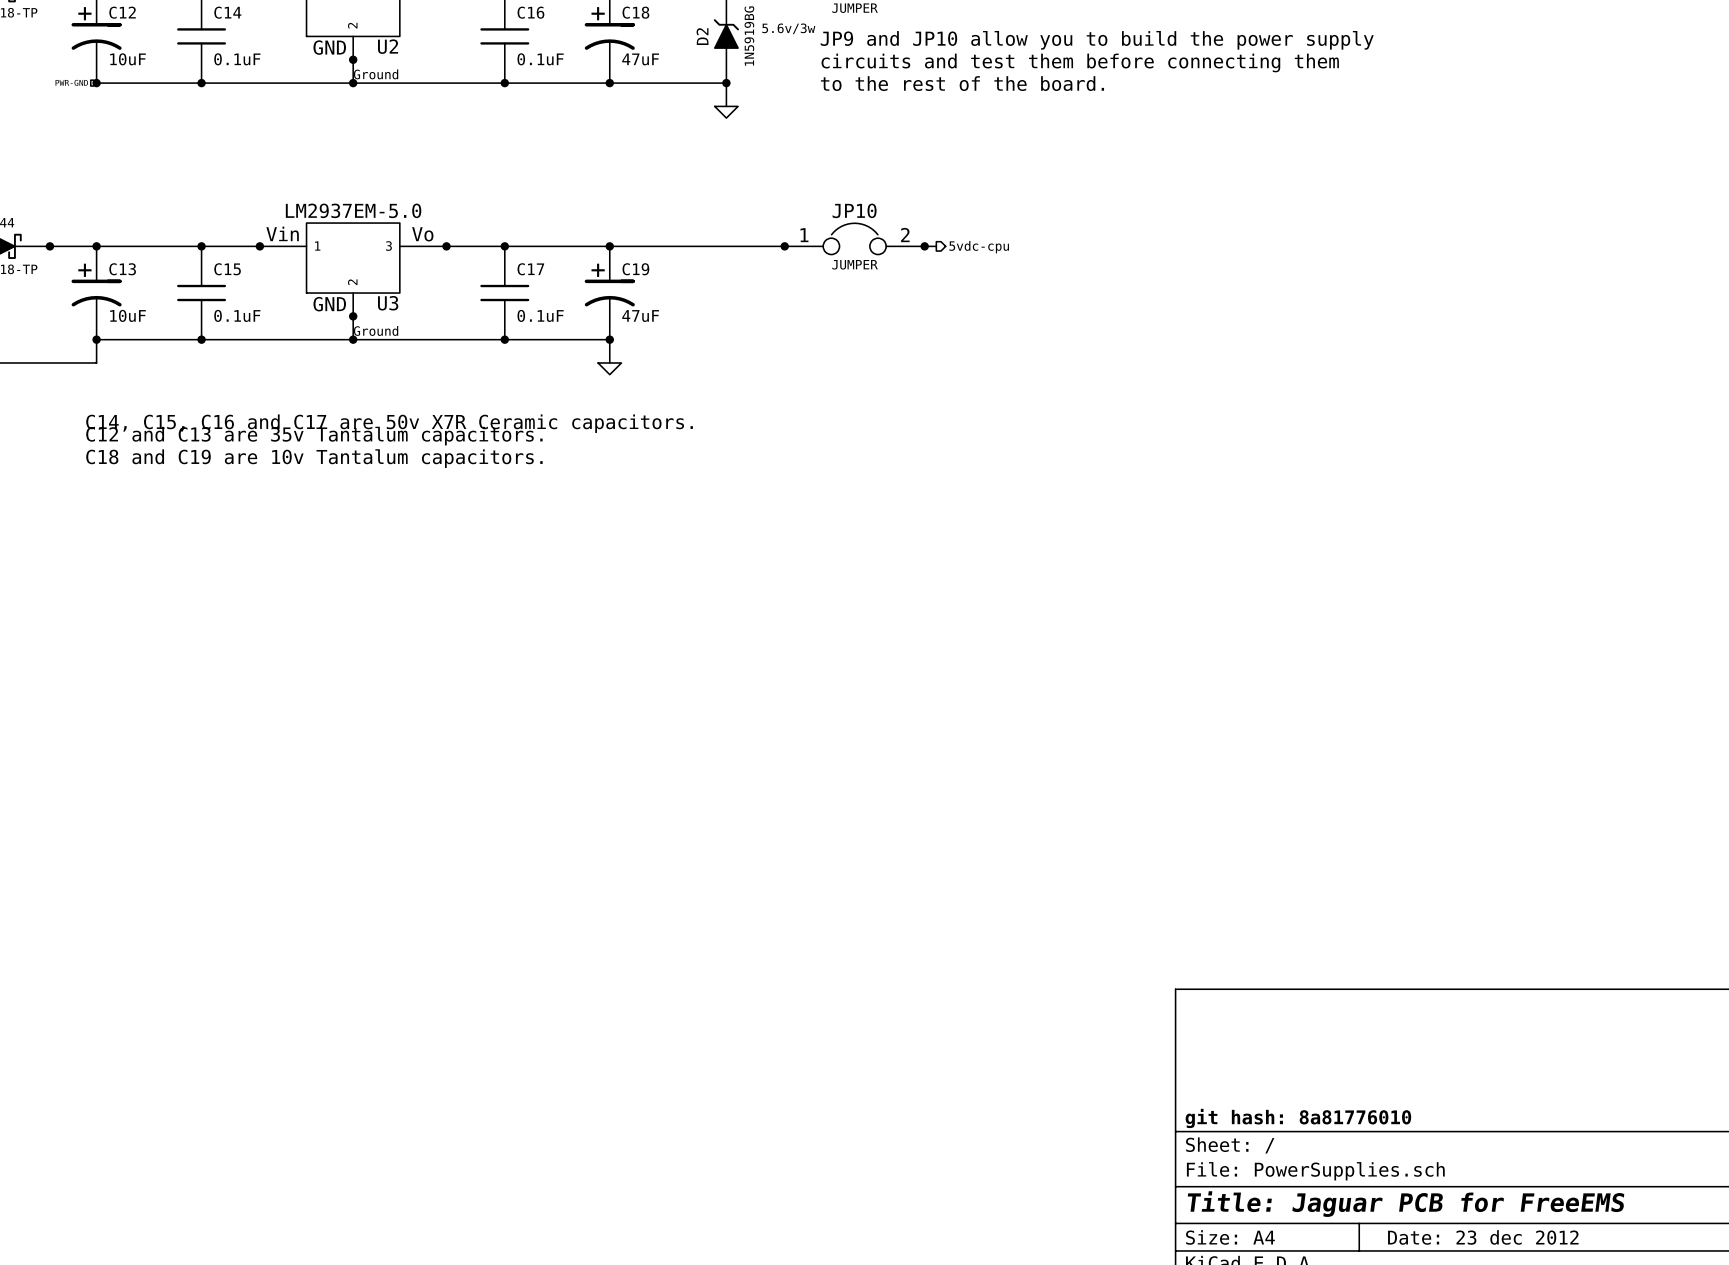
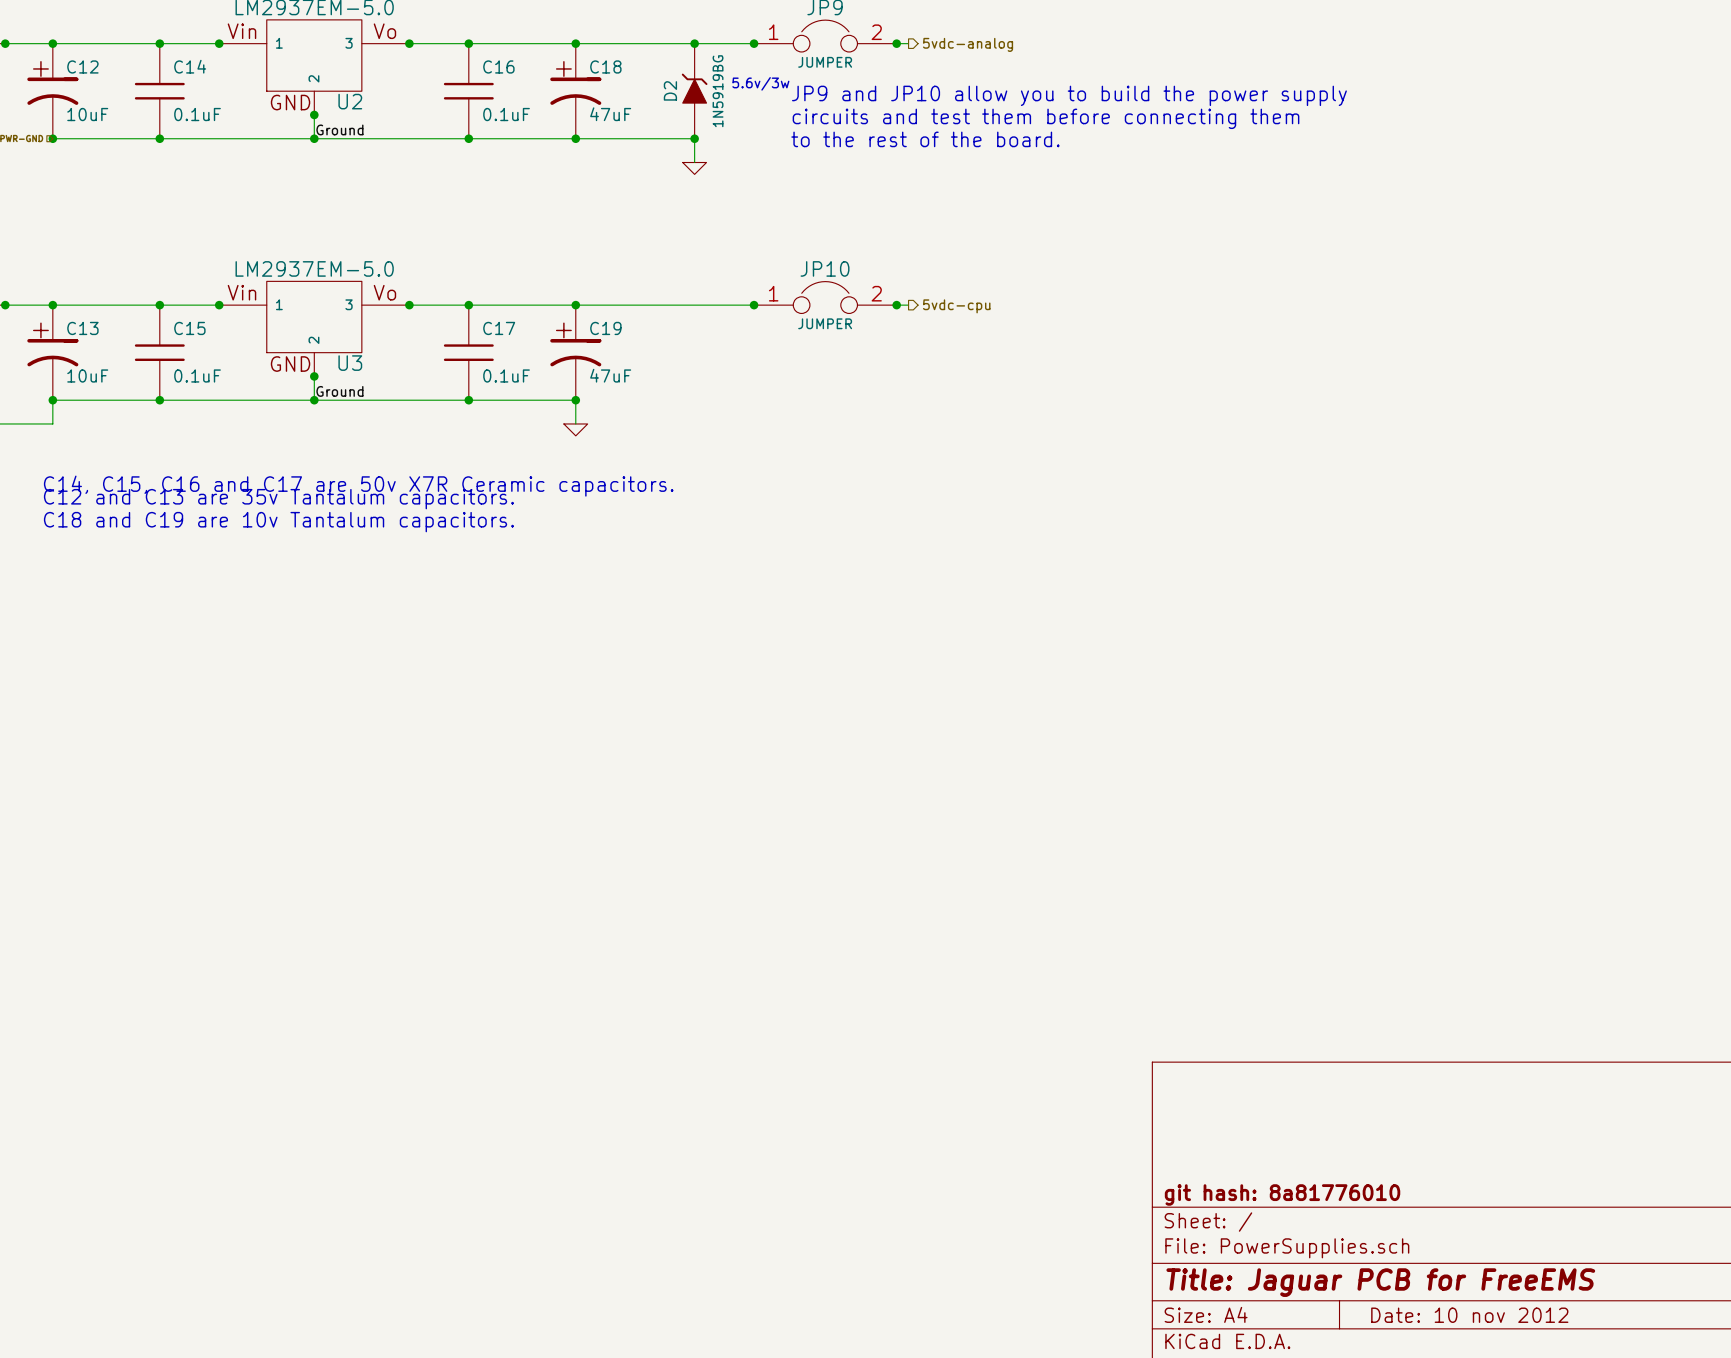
title block: Date: 23 dec 2012 (1483, 1237) -> Date: 10 nov 2012 (1469, 1315)

